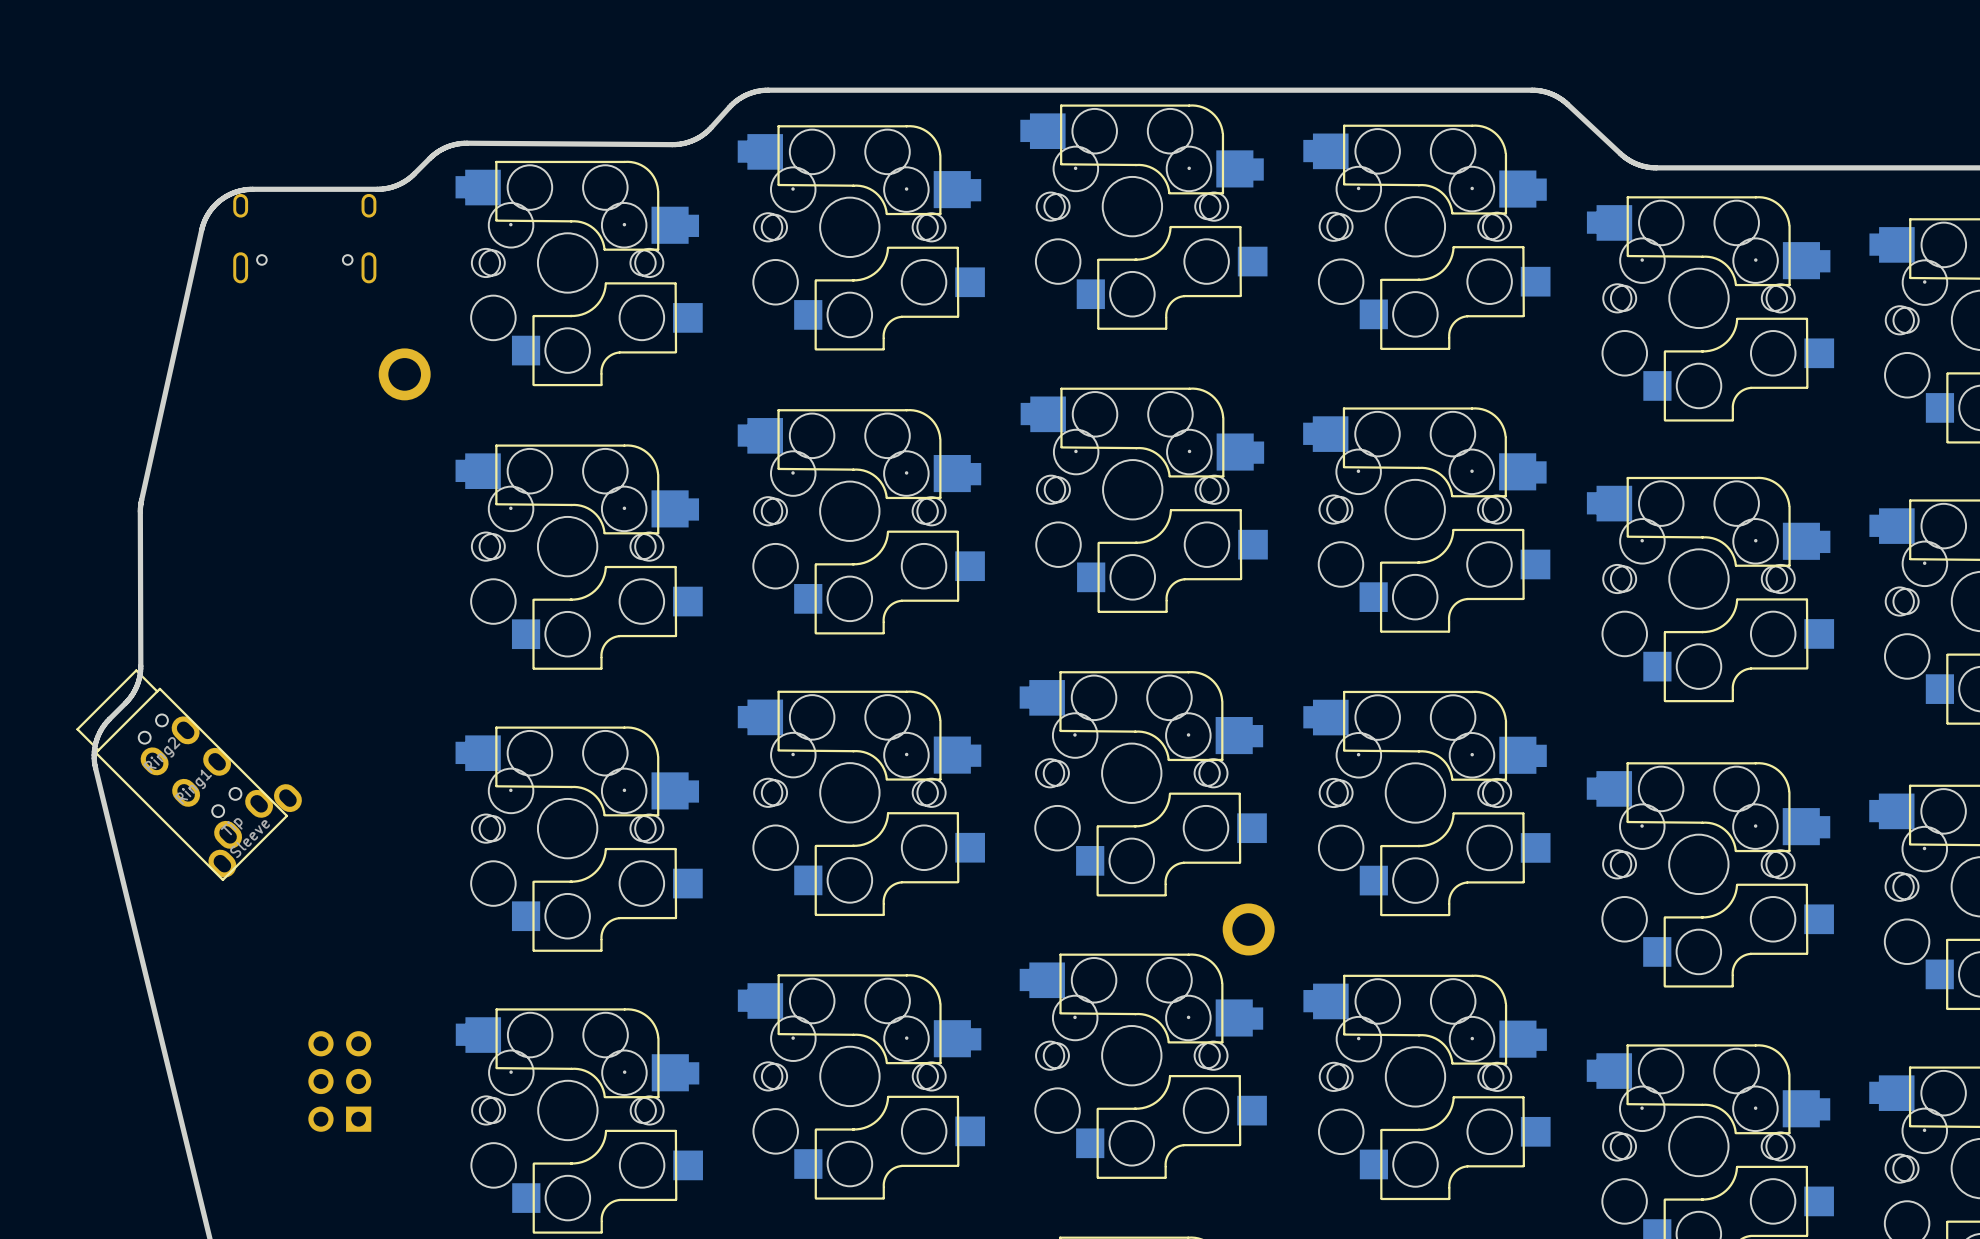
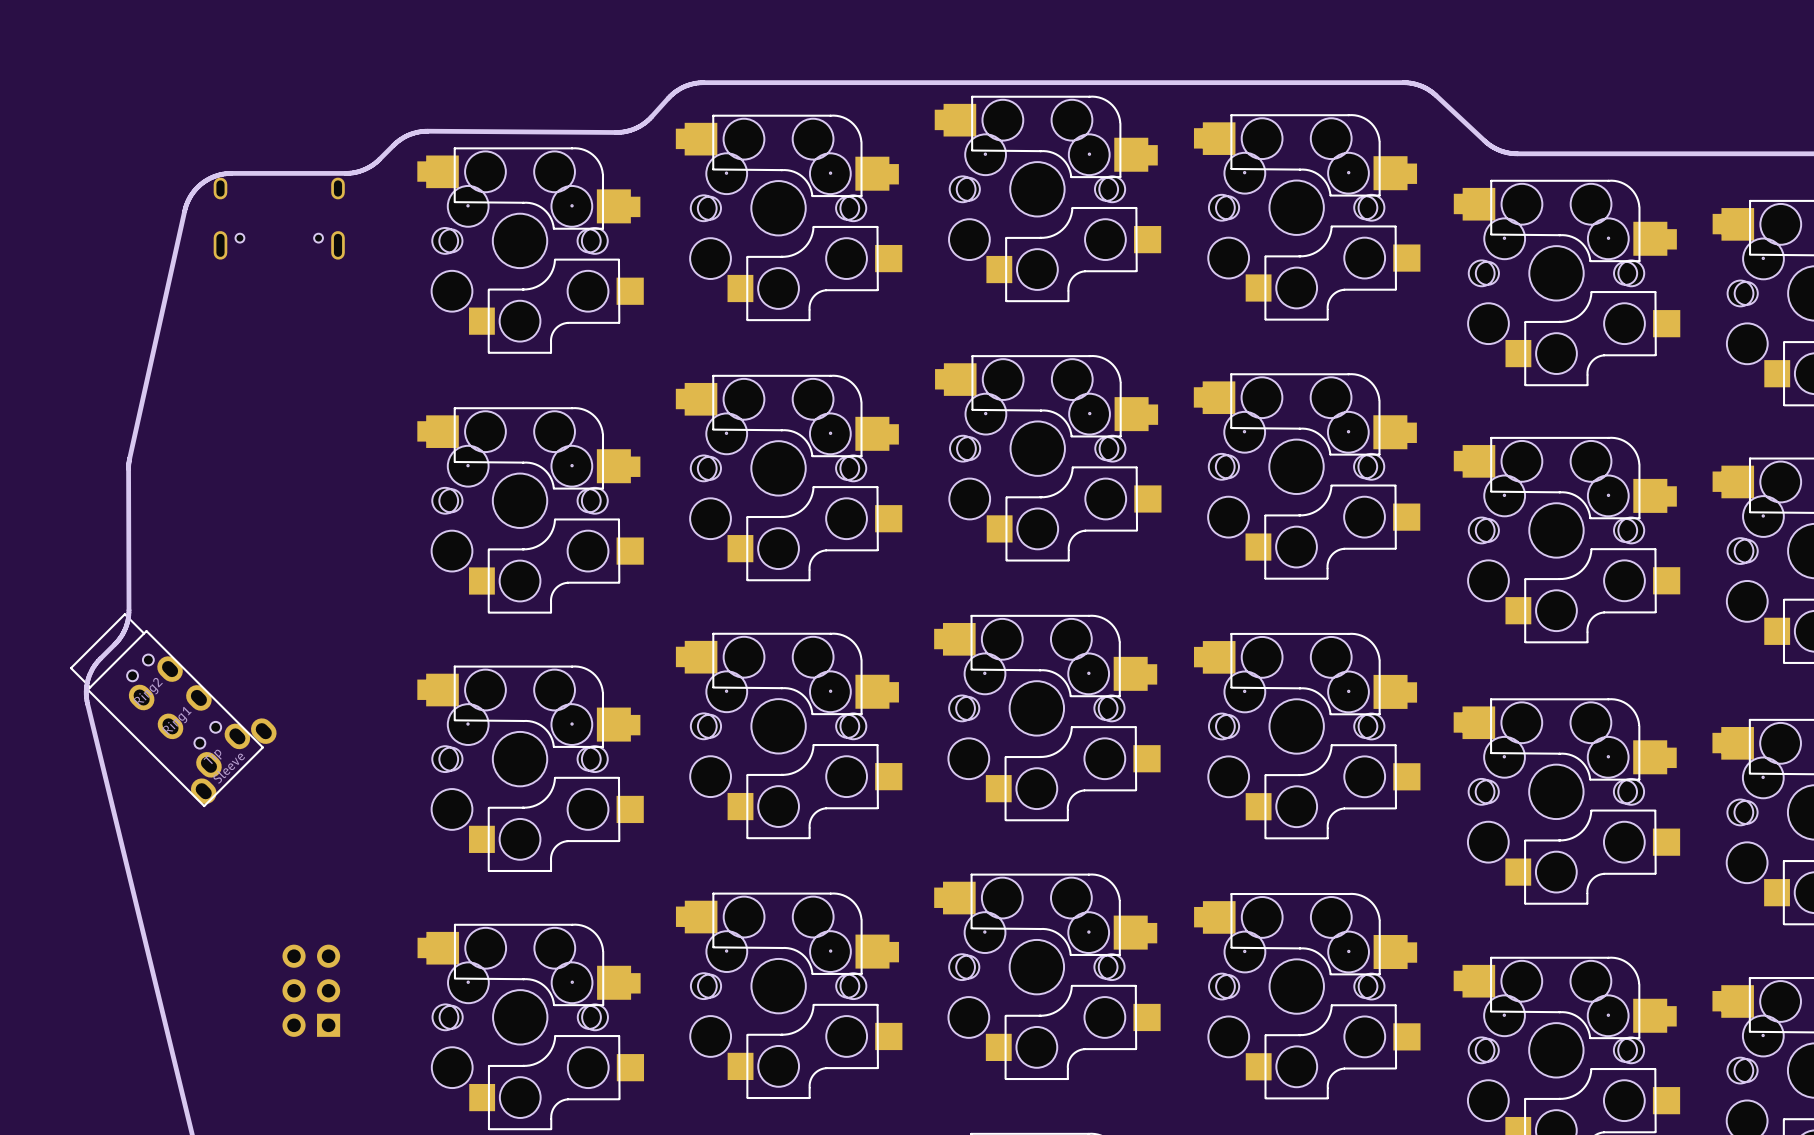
part: (404, 374) -> none
part: (1248, 929) -> none

